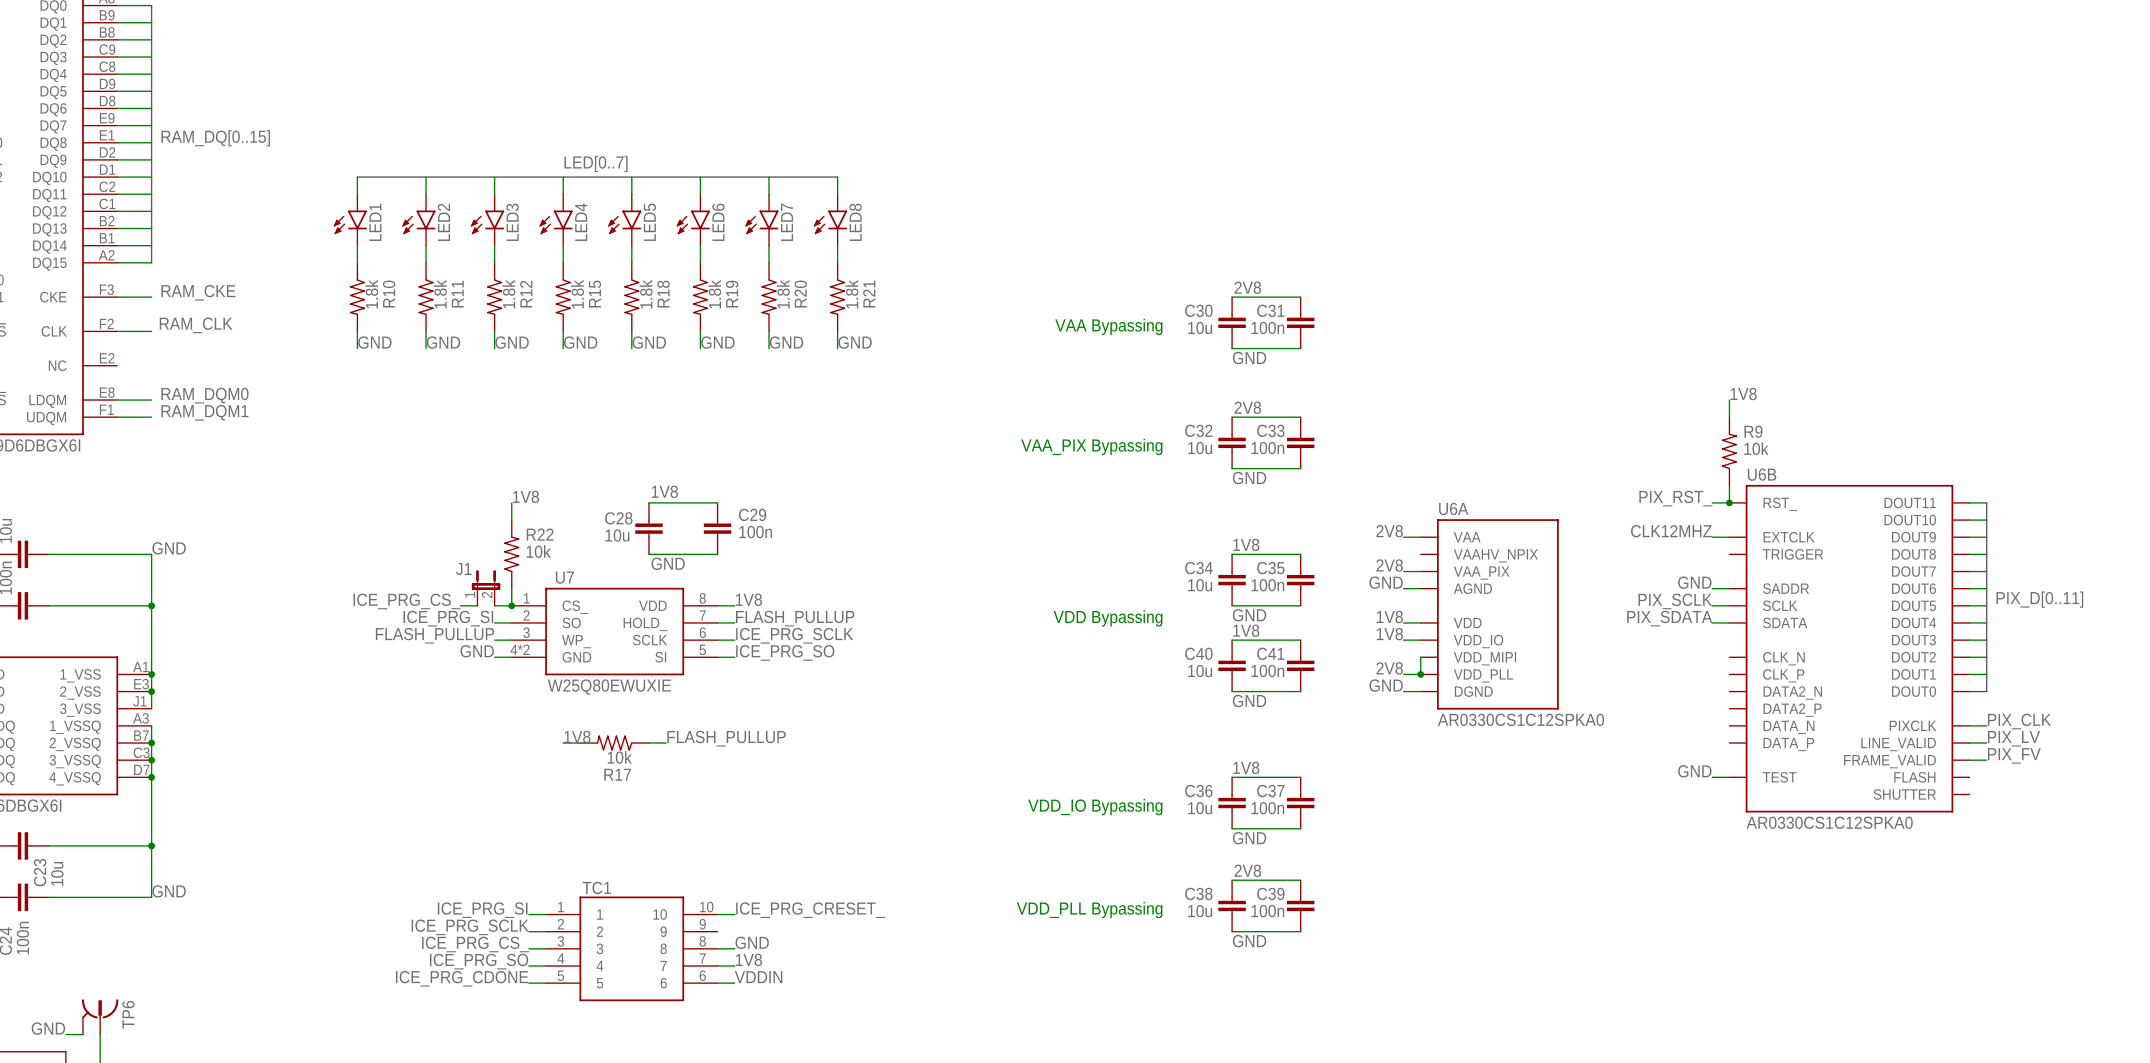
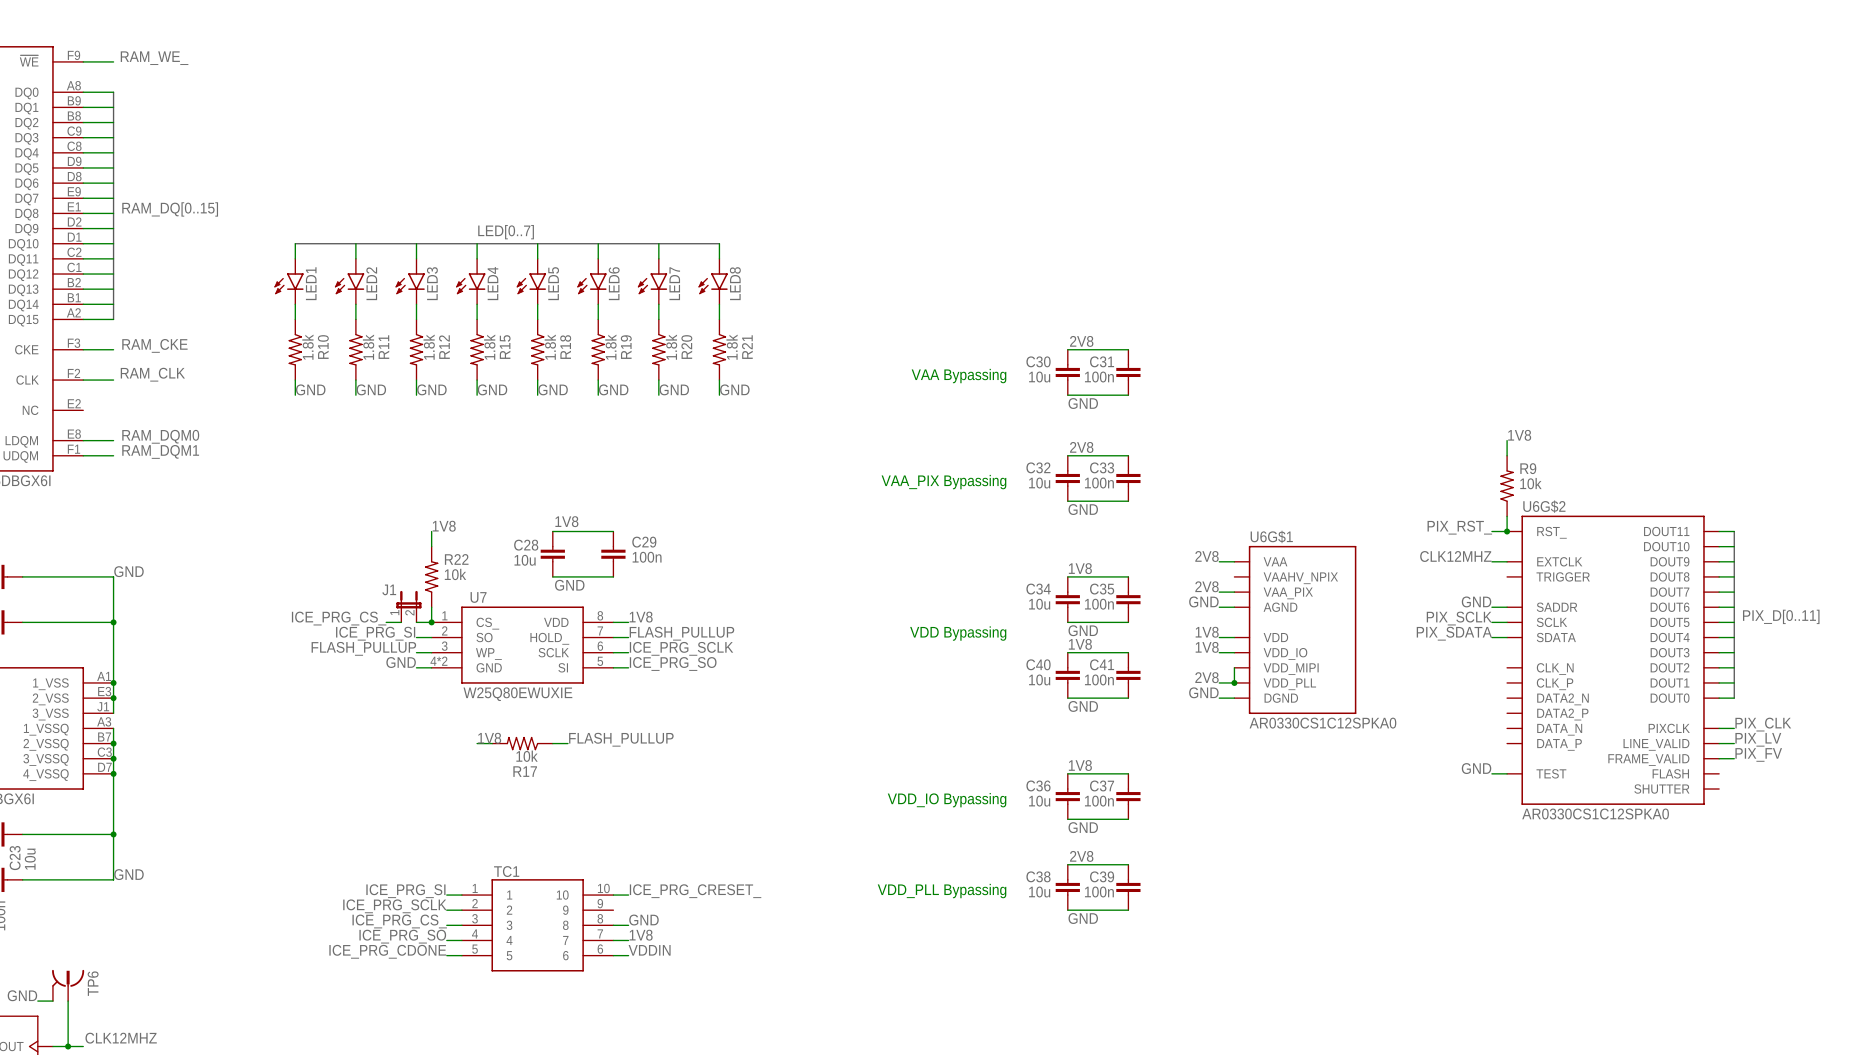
U6B name: U6B (1762, 474) -> U6G$2 (1544, 506)
U6A name: U6A (1453, 508) -> U6G$1 (1271, 536)

